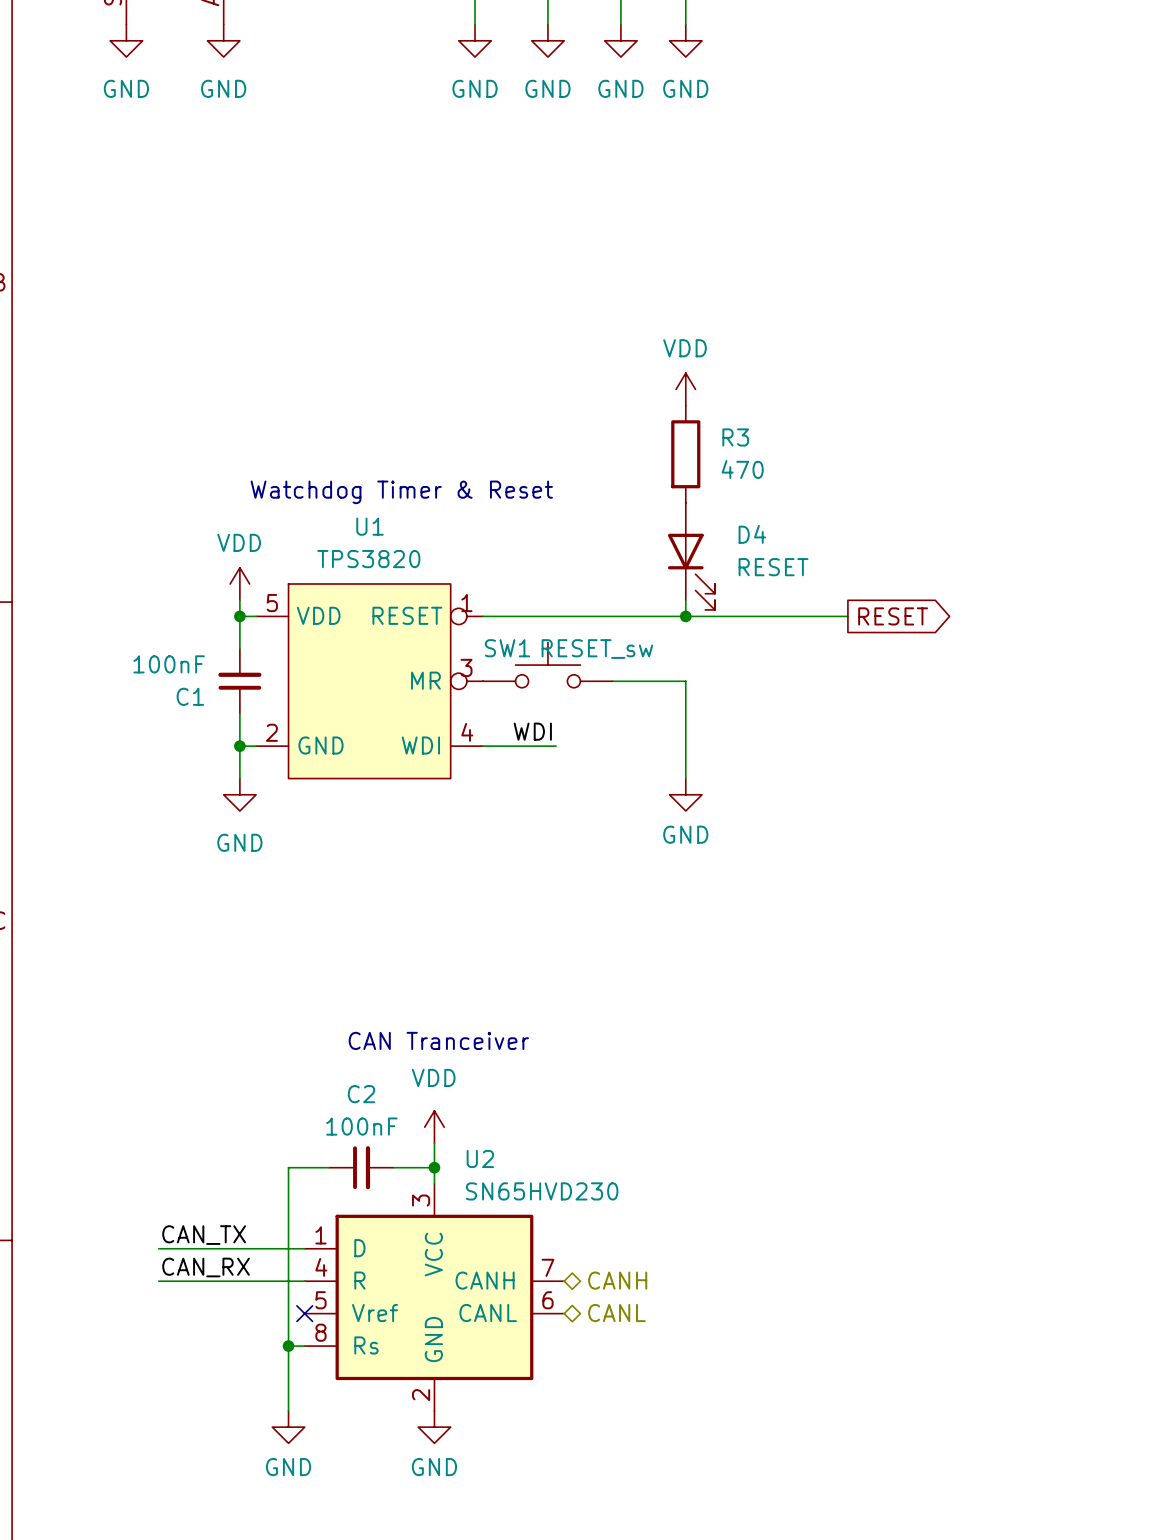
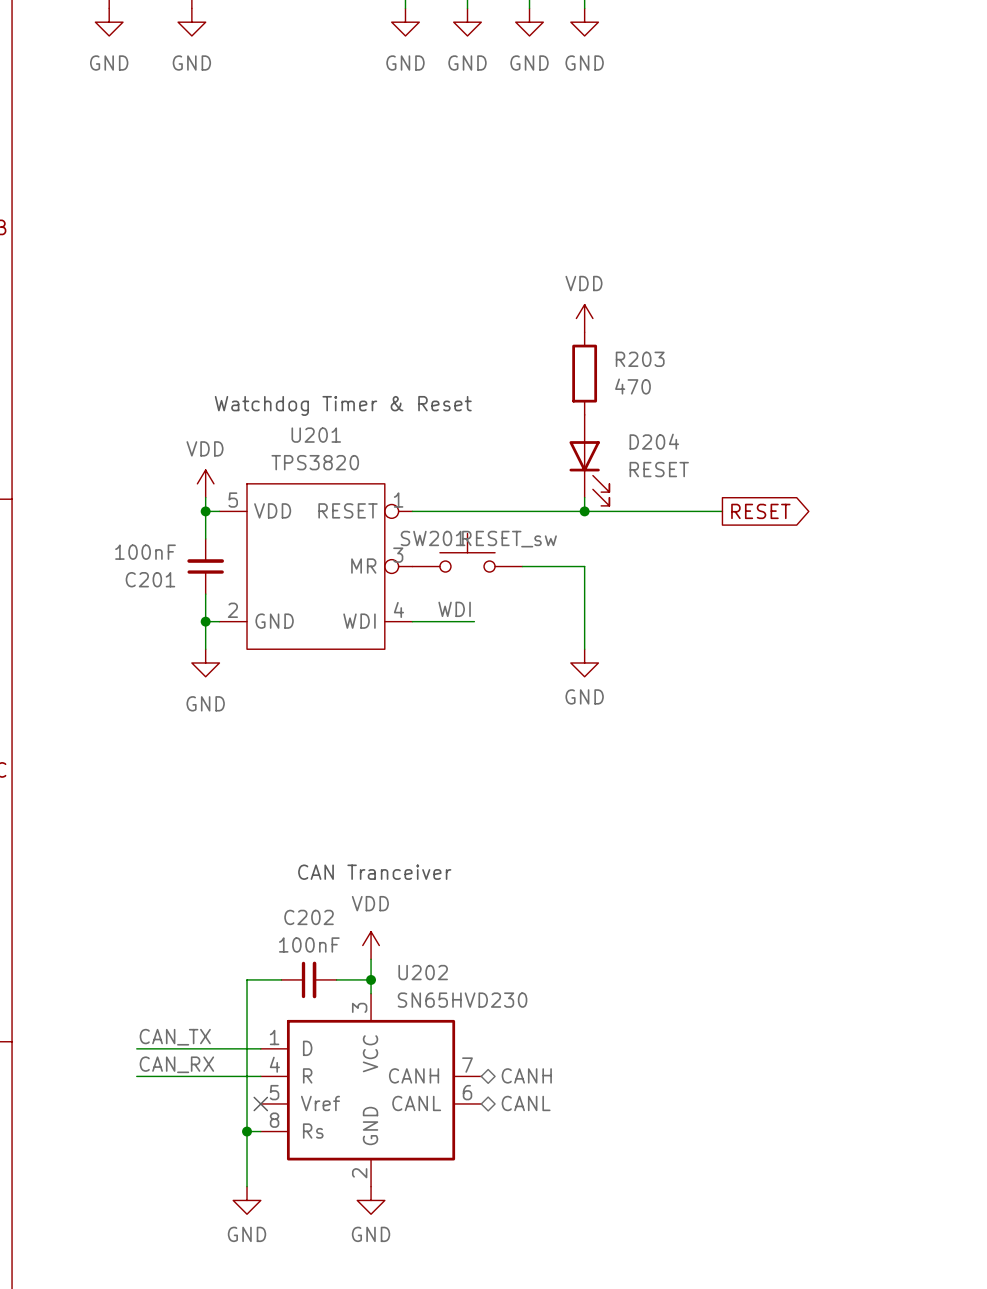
R3 name: R3 (735, 437) -> R203 (640, 359)
U1 name: U1 (369, 526) -> U201 (316, 435)
D4 name: D4 (752, 534) -> D204 (654, 441)
SW1 name: SW1 (507, 648) -> SW201 (433, 538)
C1 name: C1 (190, 696) -> C201 (150, 579)
C2 name: C2 (361, 1094) -> C202 (309, 917)
U2 name: U2 (480, 1158) -> U202 (423, 972)

